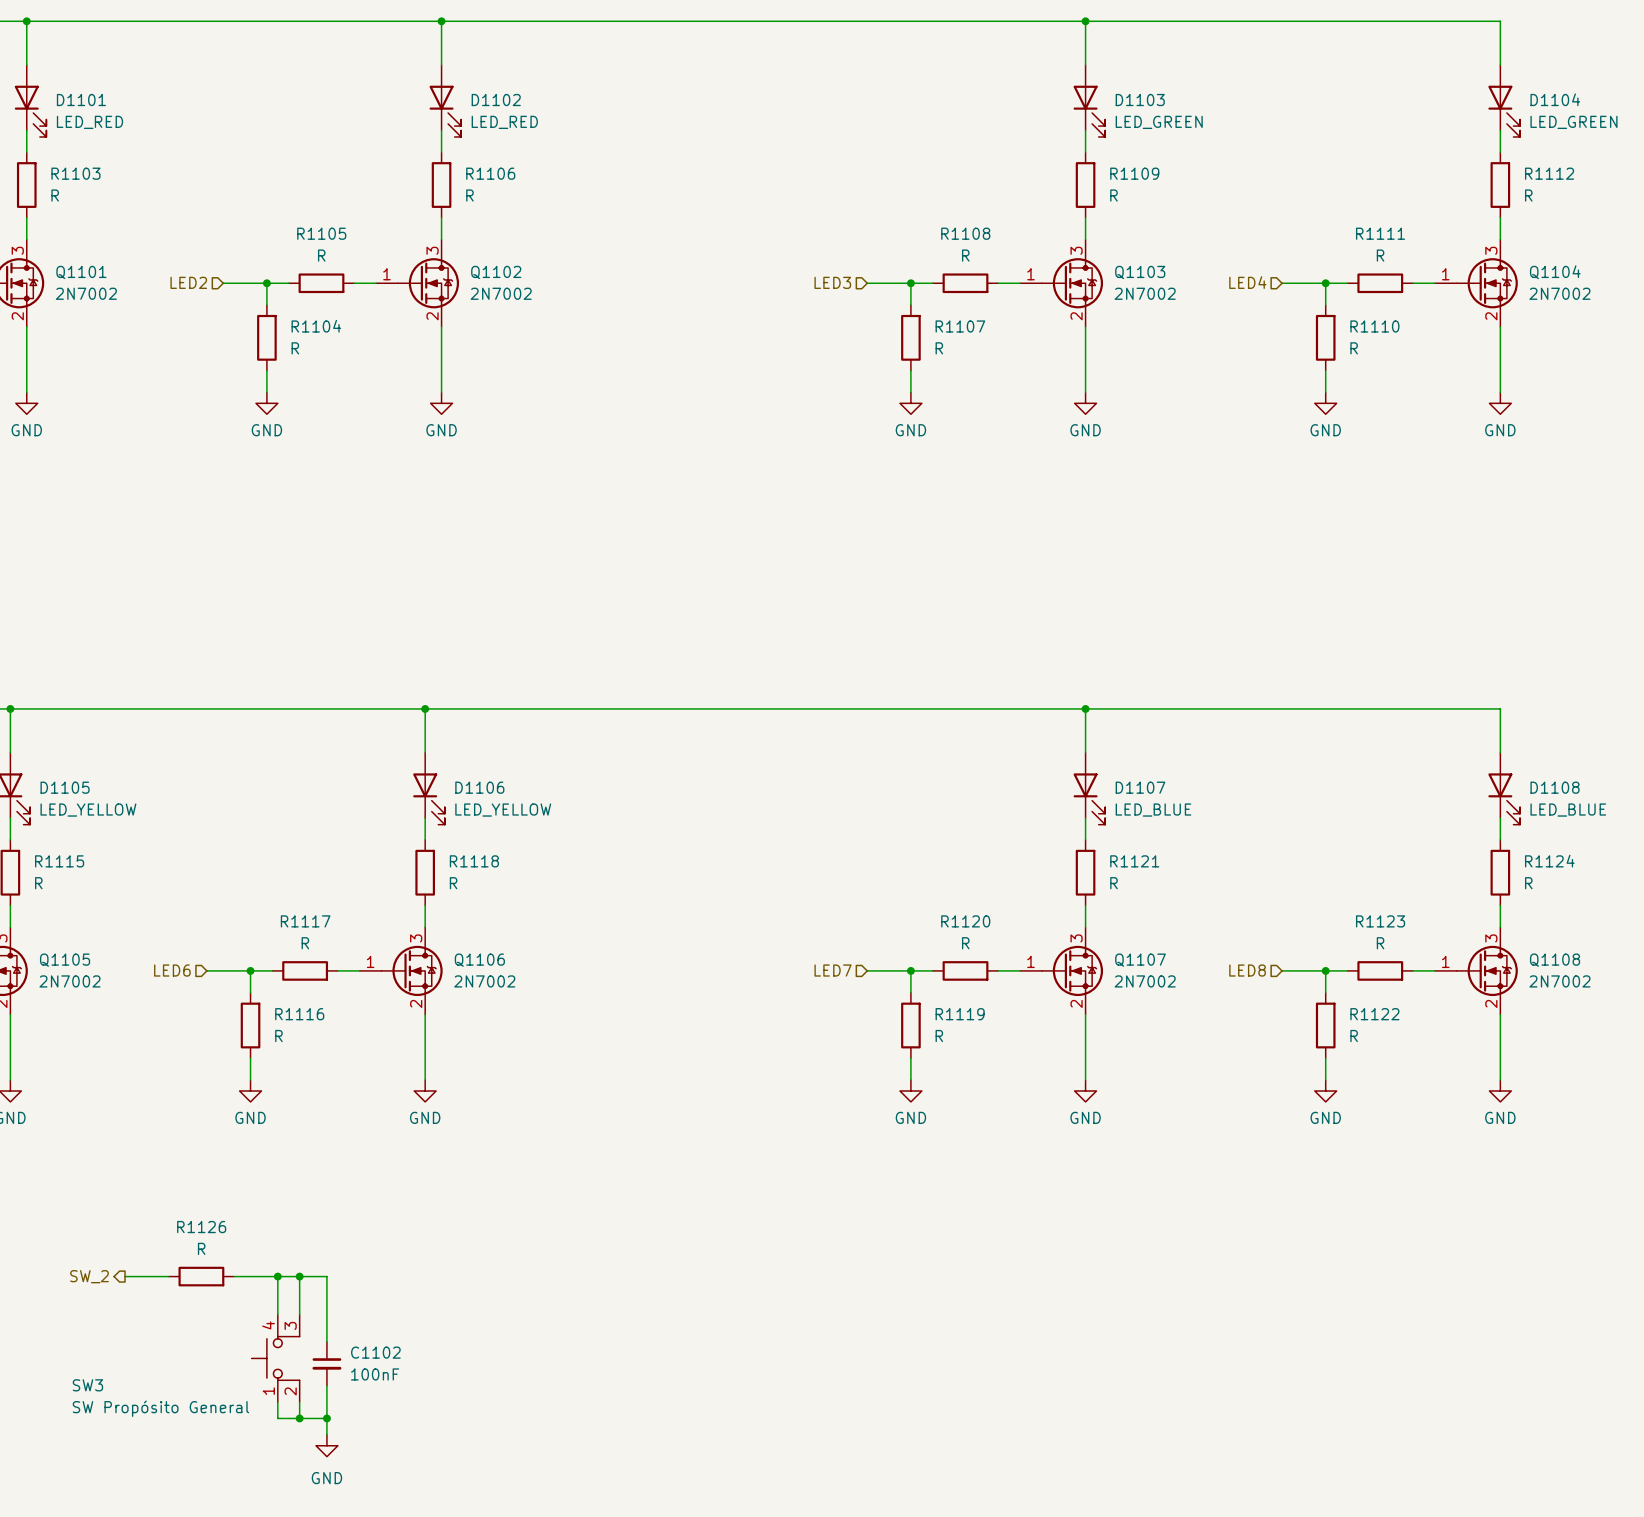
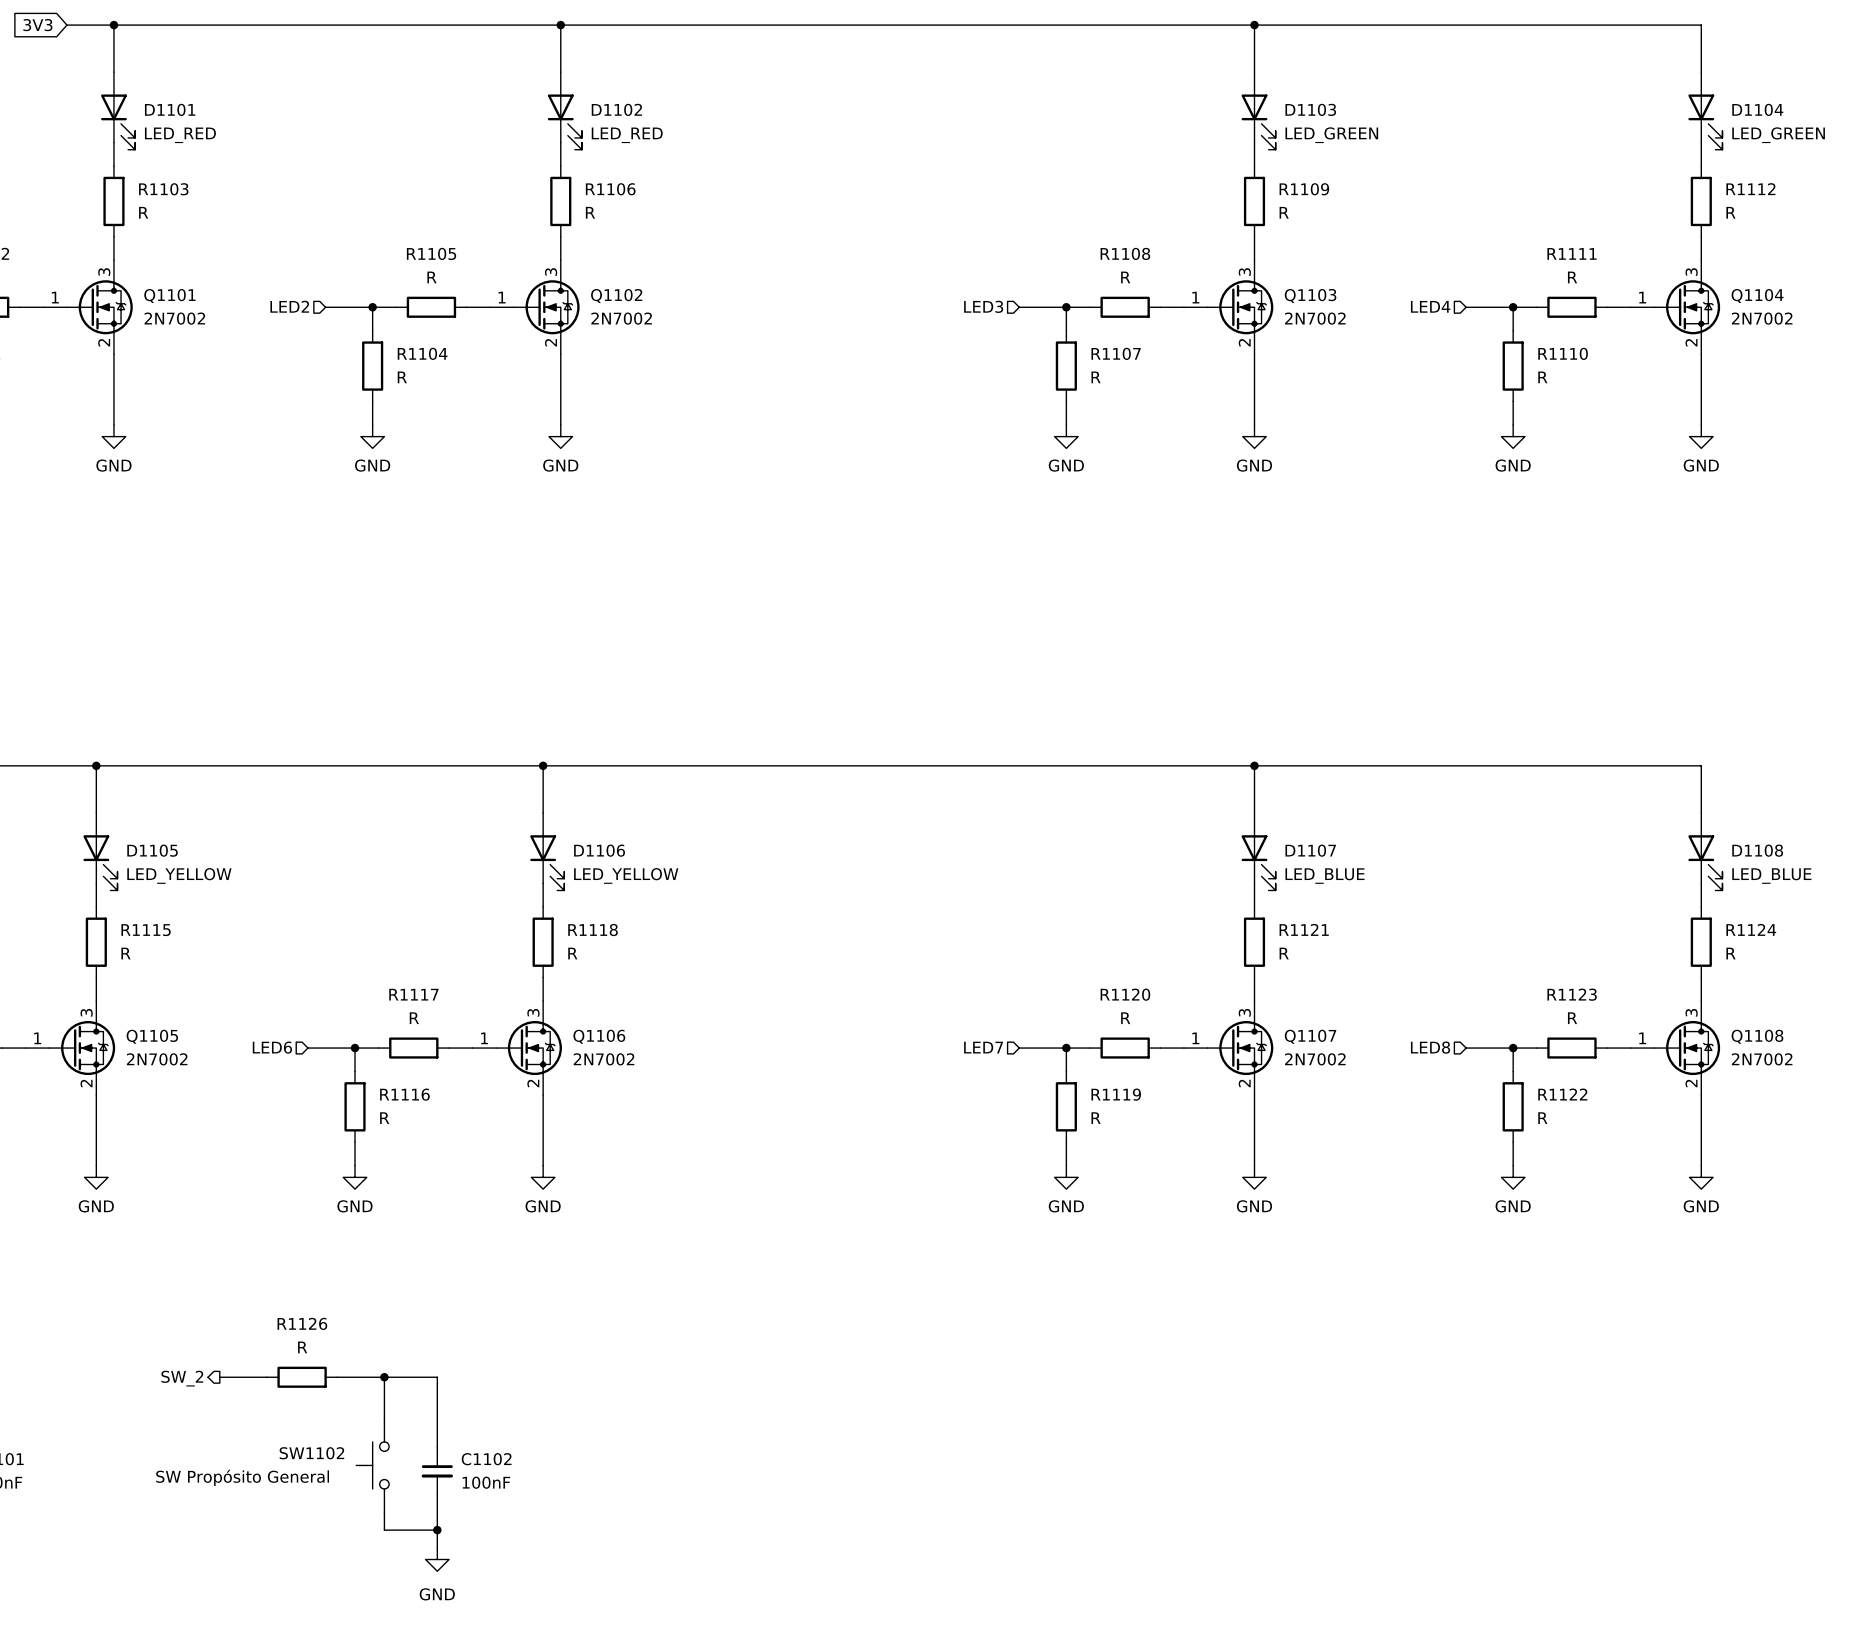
wire: (299, 1276) (299, 1314) -> none
junction: (299, 1276) -> none
SW1102: none -> SW Propósito General (372, 1465)
SW3: SW Propósito General (275, 1358) -> none
wire: (299, 1402) (299, 1418) -> none
junction: (299, 1418) -> none

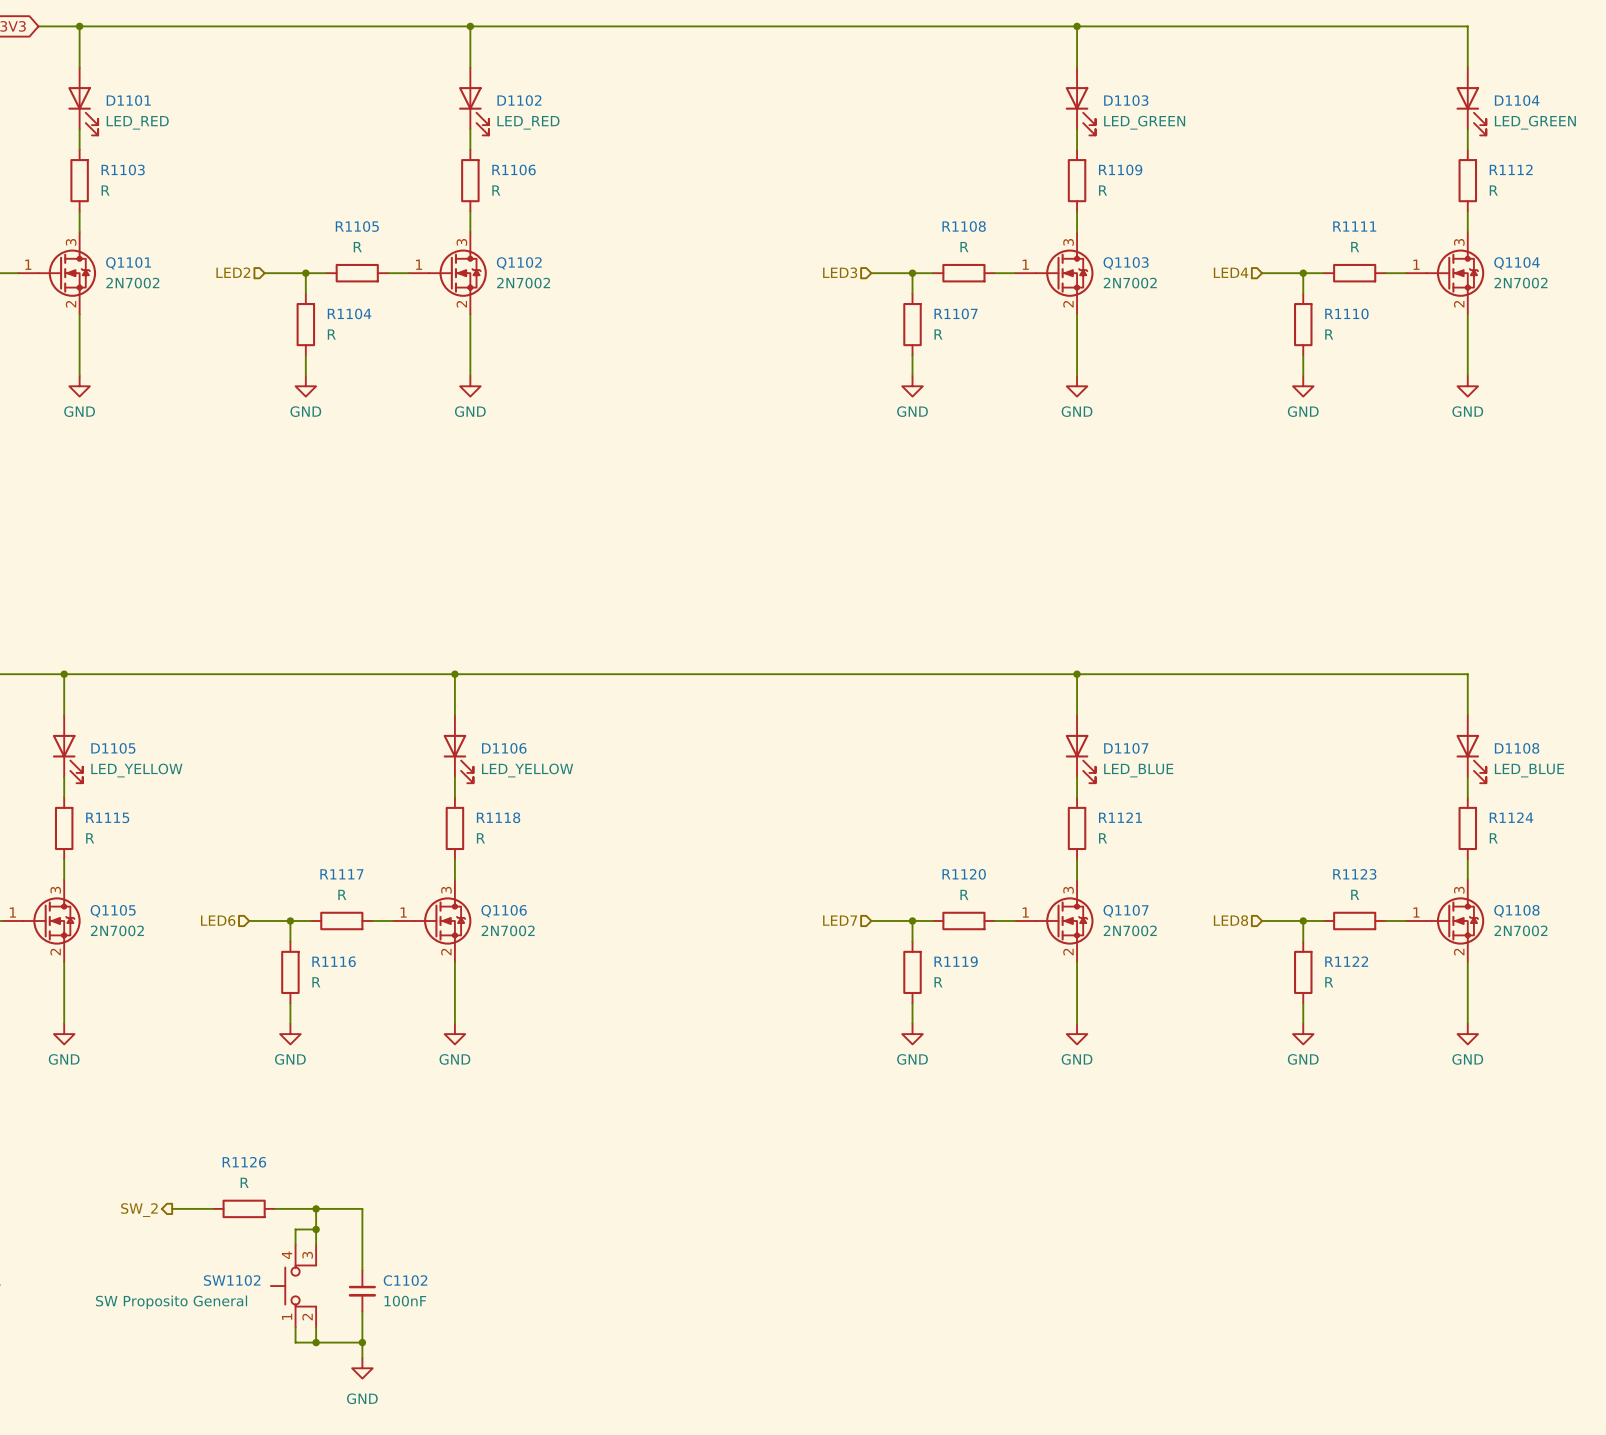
wire: none -> (316, 1229) (295, 1229) (295, 1244)
junction: none -> (316, 1229)
SW1102 symbol: [356, 1418, 390, 1513] -> [270, 1244, 317, 1328]
SW1102 value: SW Propósito General (242, 1477) -> SW Proposito General (171, 1302)
wire: none -> (295, 1327) (295, 1342) (316, 1342)
junction: none -> (316, 1342)

